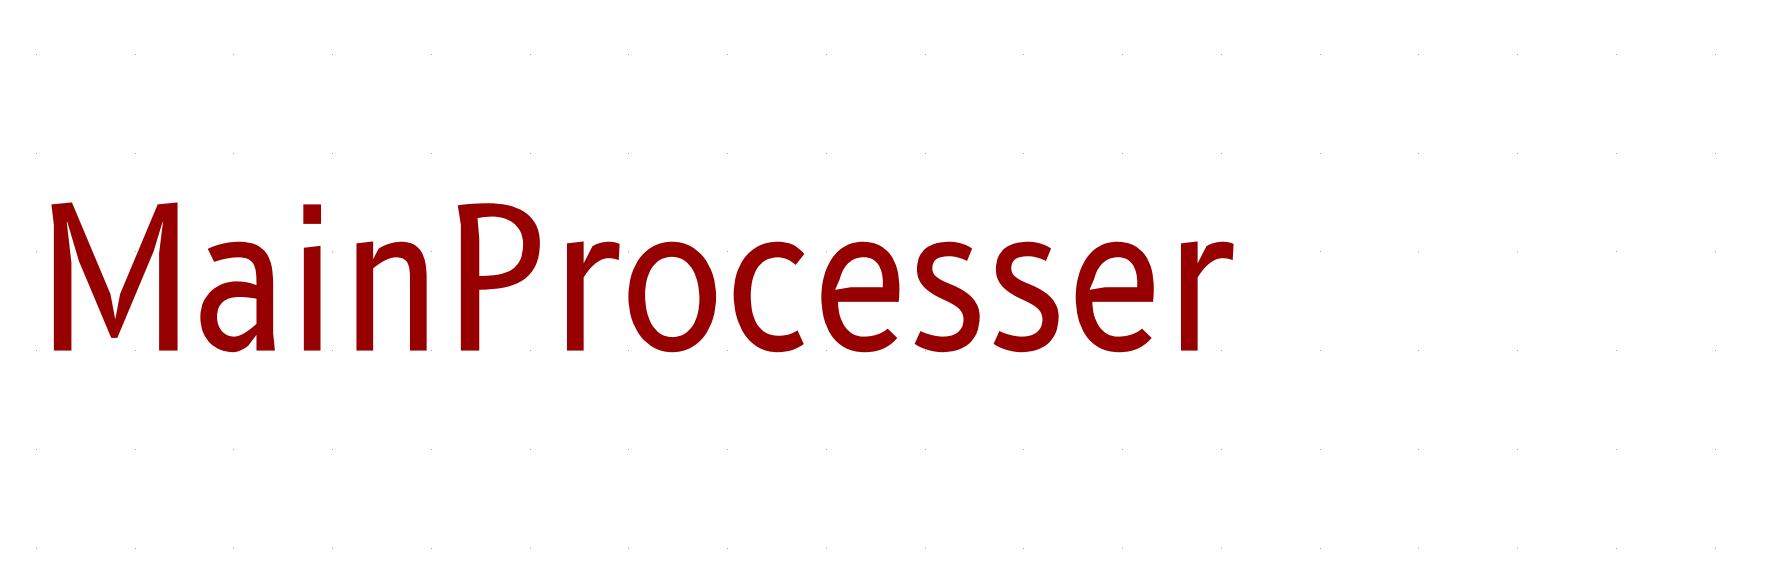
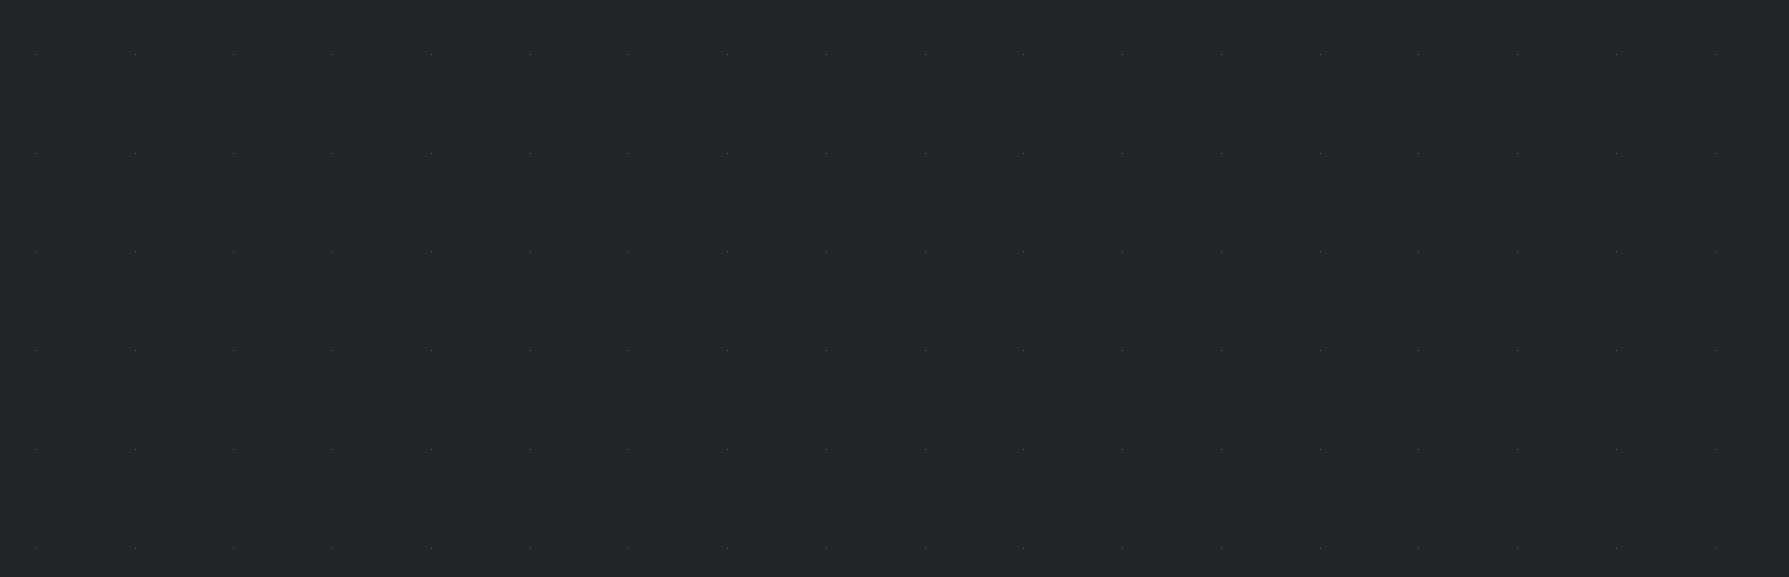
text: MainProcesser (642, 277) -> none

